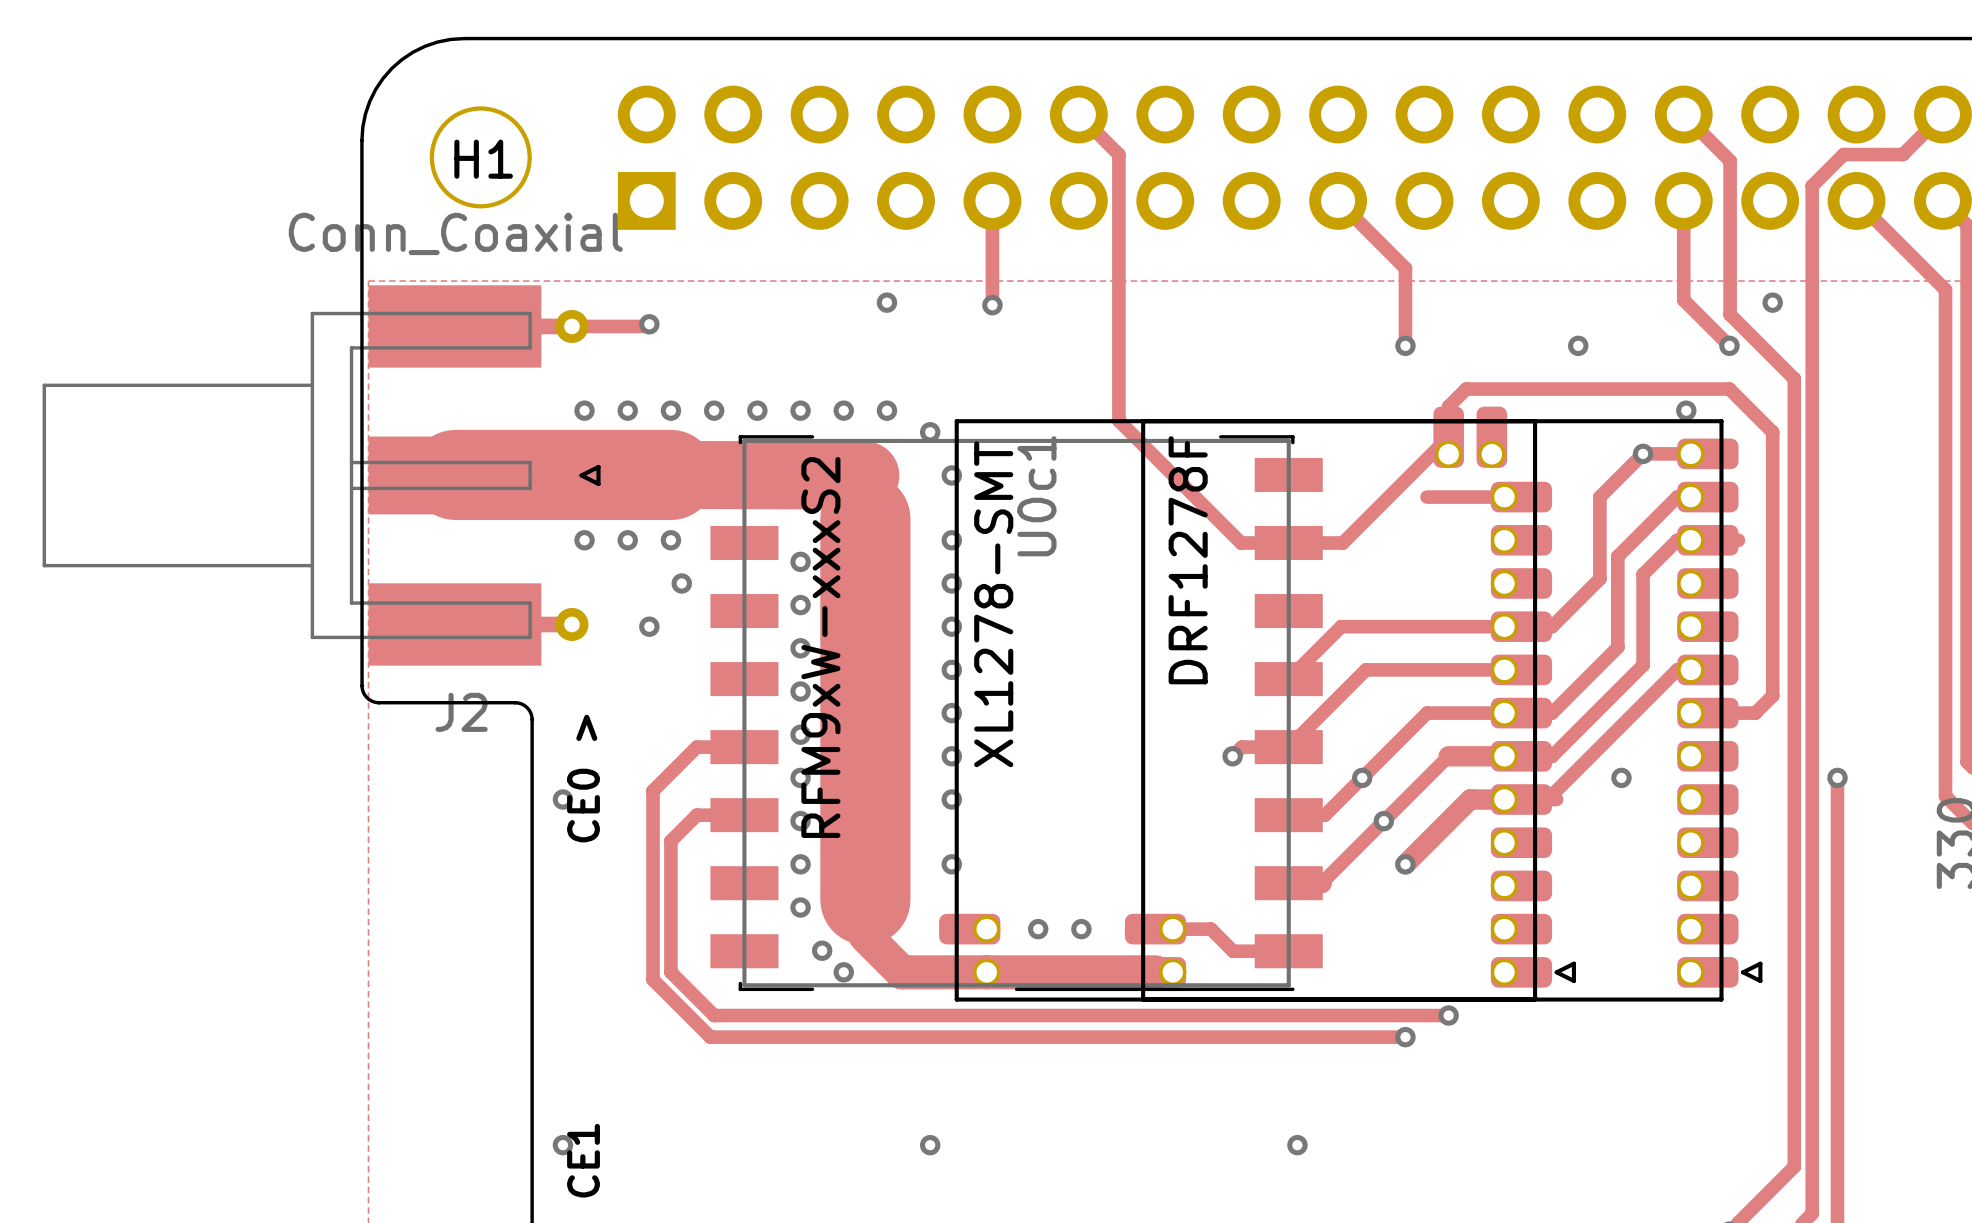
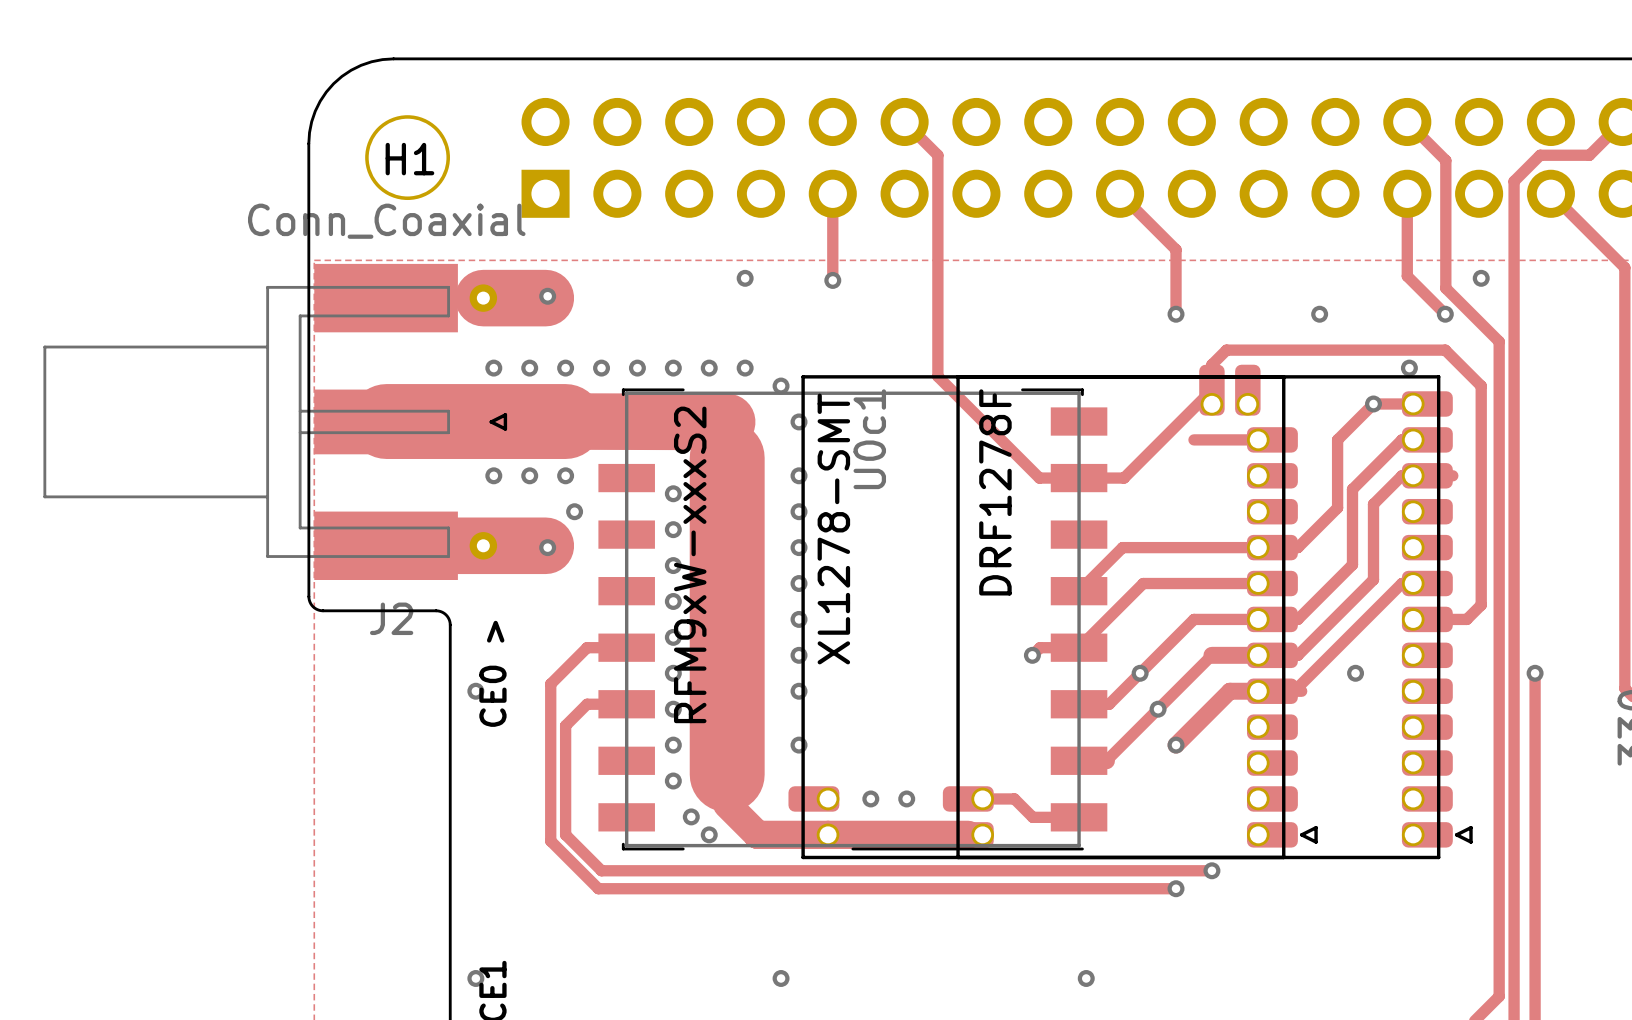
track width: thin (571, 326) (647, 326) -> thick (483, 298) (545, 298)
track: none -> (386, 545) (545, 545) (547, 547)

